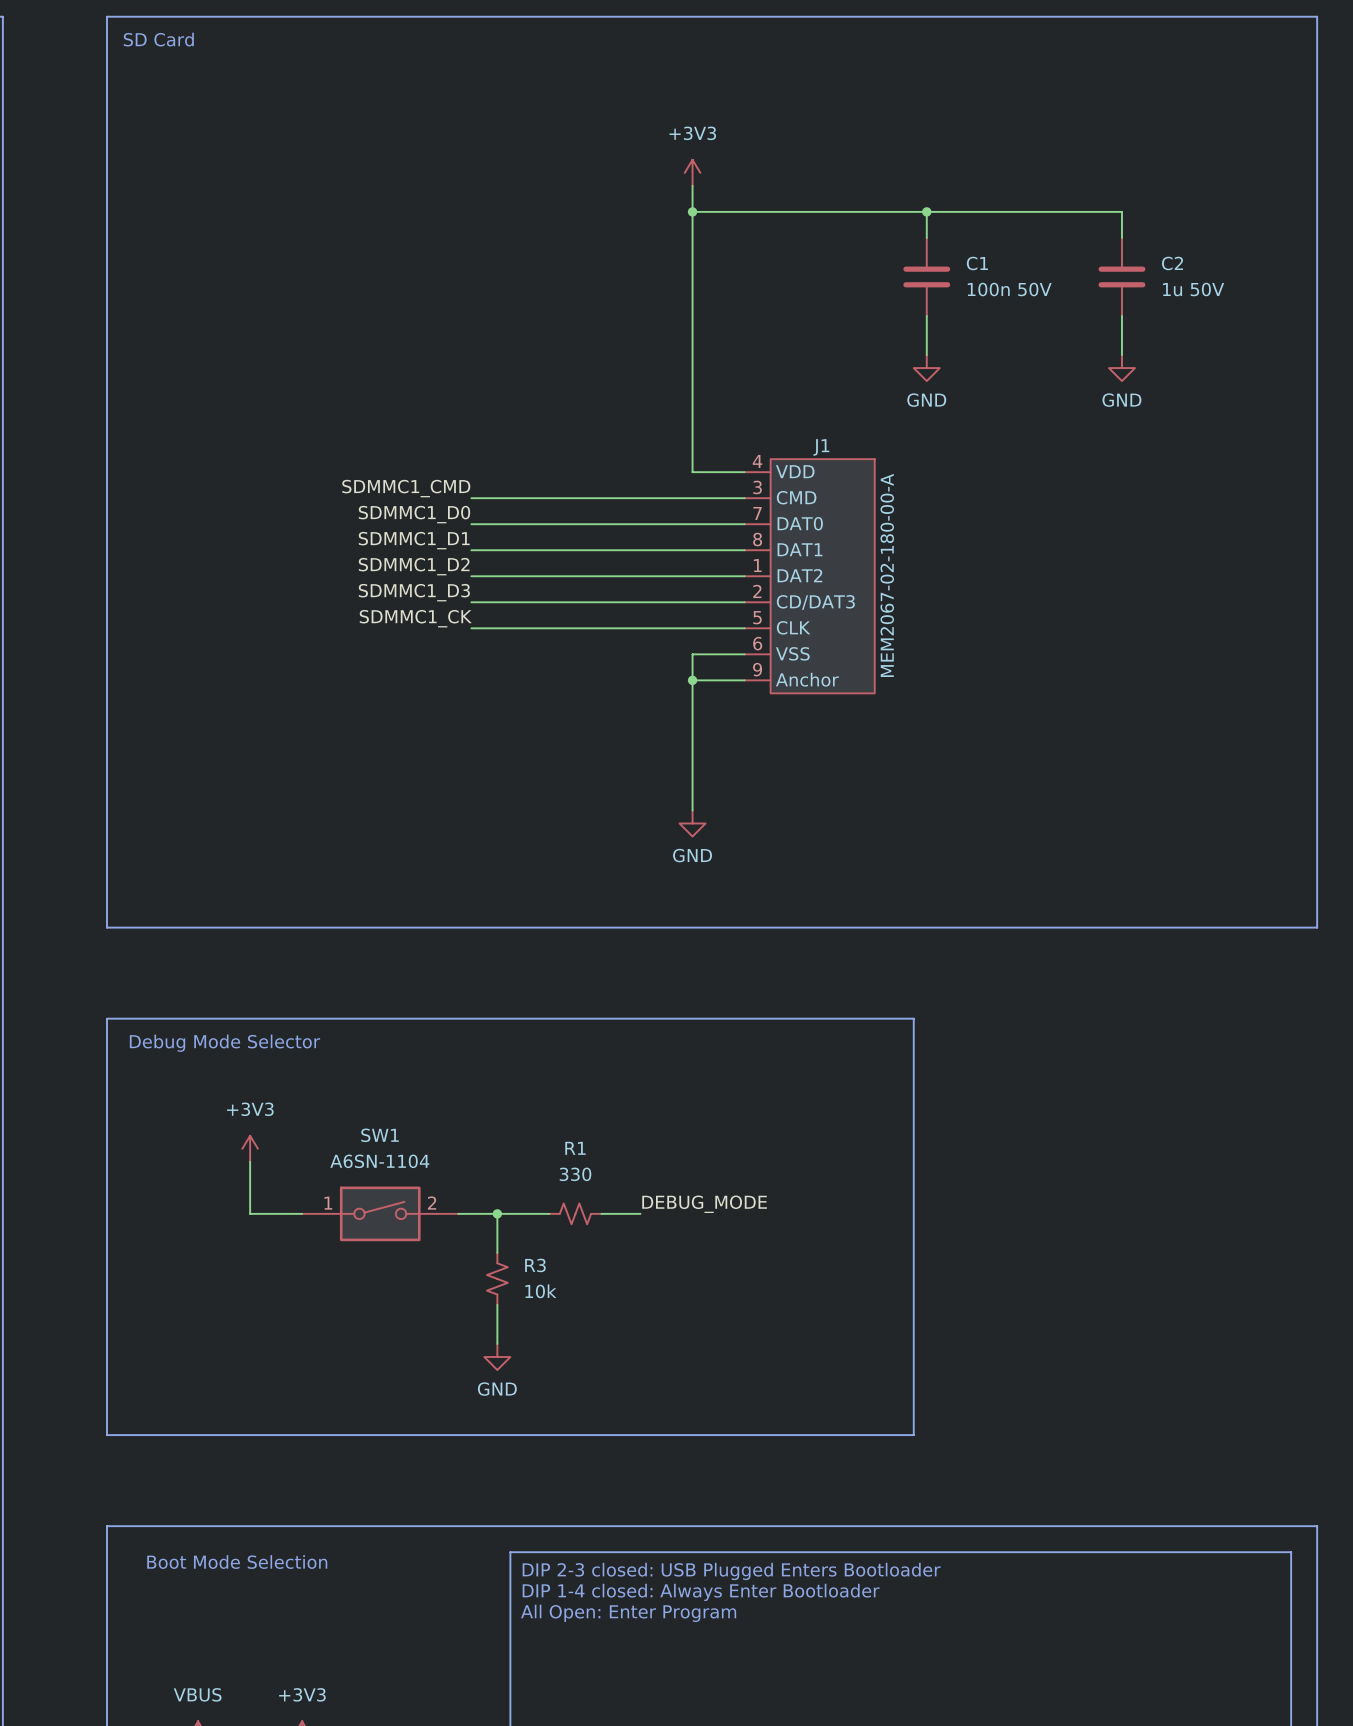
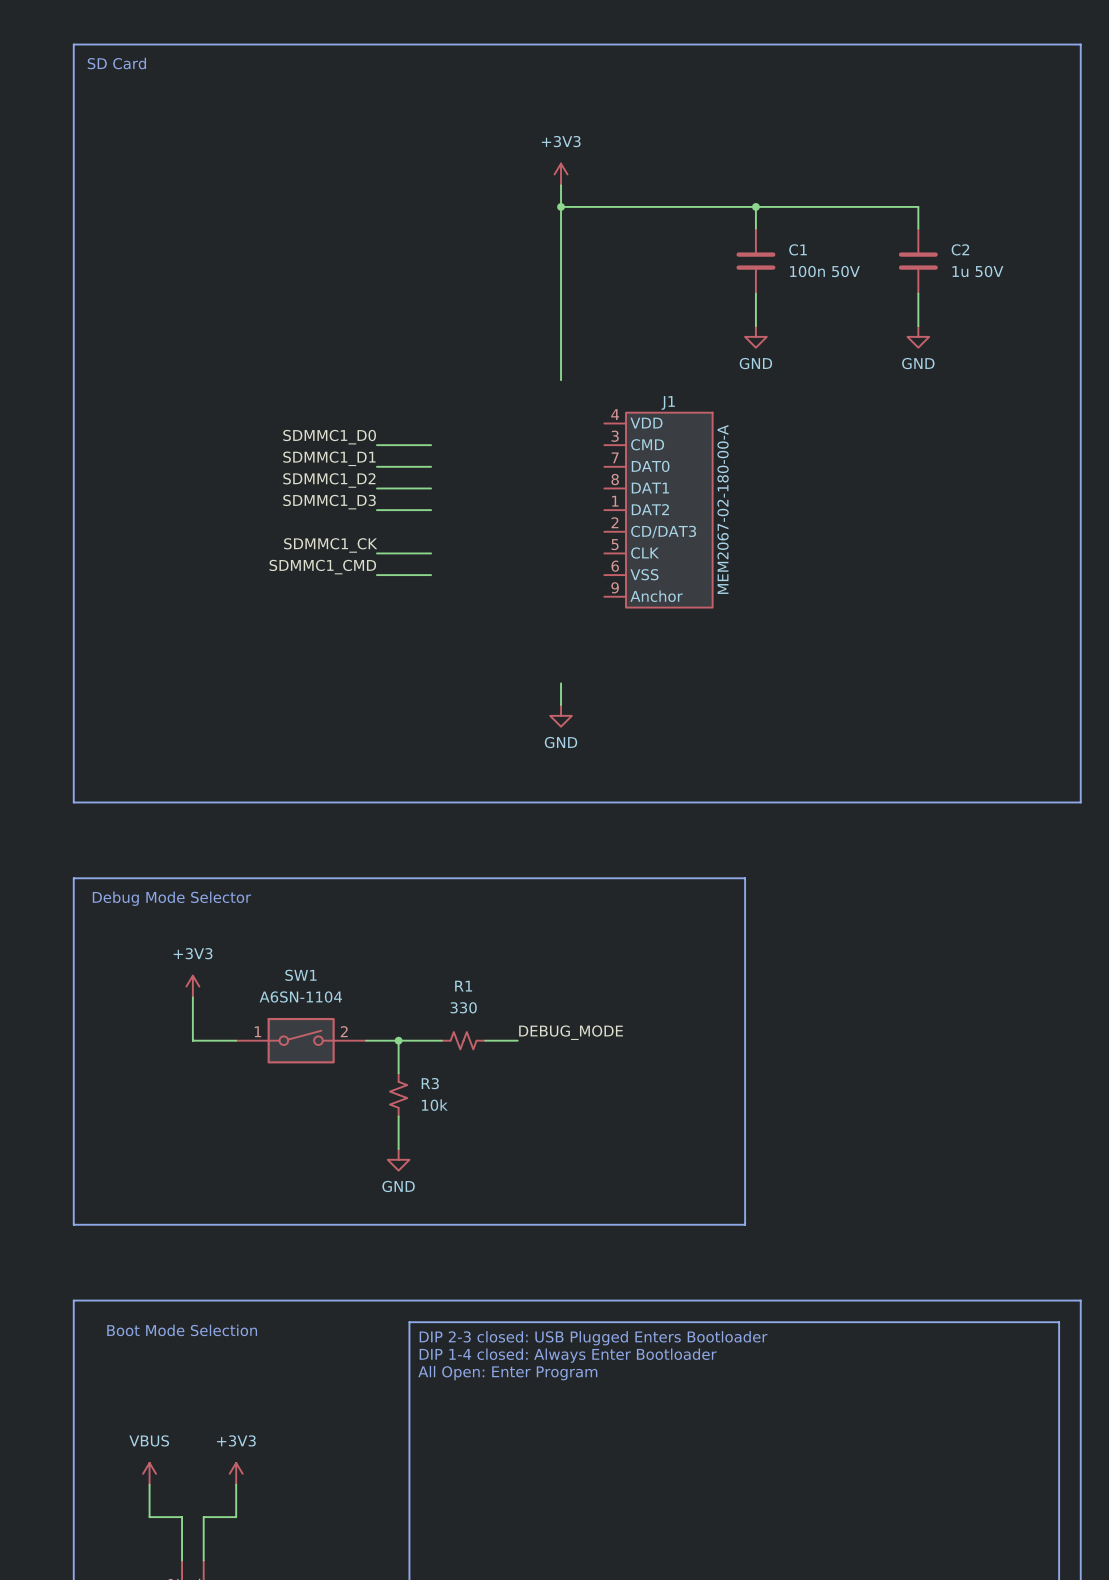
wire: (692, 420) (692, 472) (744, 472) -> none
label: SDMMC1_CMD (406, 488) -> SDMMC1_D0 (329, 437)
wire: (536, 498) (744, 498) -> none
label: SDMMC1_D0 (414, 514) -> SDMMC1_D1 (329, 458)
wire: (536, 524) (744, 524) -> none
label: SDMMC1_D1 (414, 540) -> SDMMC1_D2 (329, 480)
wire: (536, 550) (744, 550) -> none
label: SDMMC1_D2 (414, 566) -> SDMMC1_D3 (329, 502)
wire: (536, 576) (744, 576) -> none
label: SDMMC1_D3 (414, 592) -> none
wire: (471, 602) (744, 602) -> none
wire: (536, 628) (744, 628) -> none
label: none -> SDMMC1_CMD (322, 567)
wire: none -> (376, 575) (431, 575)
wire: (744, 654) (692, 654) (692, 784) -> none
wire: (692, 680) (744, 680) -> none
junction: (692, 680) -> none

